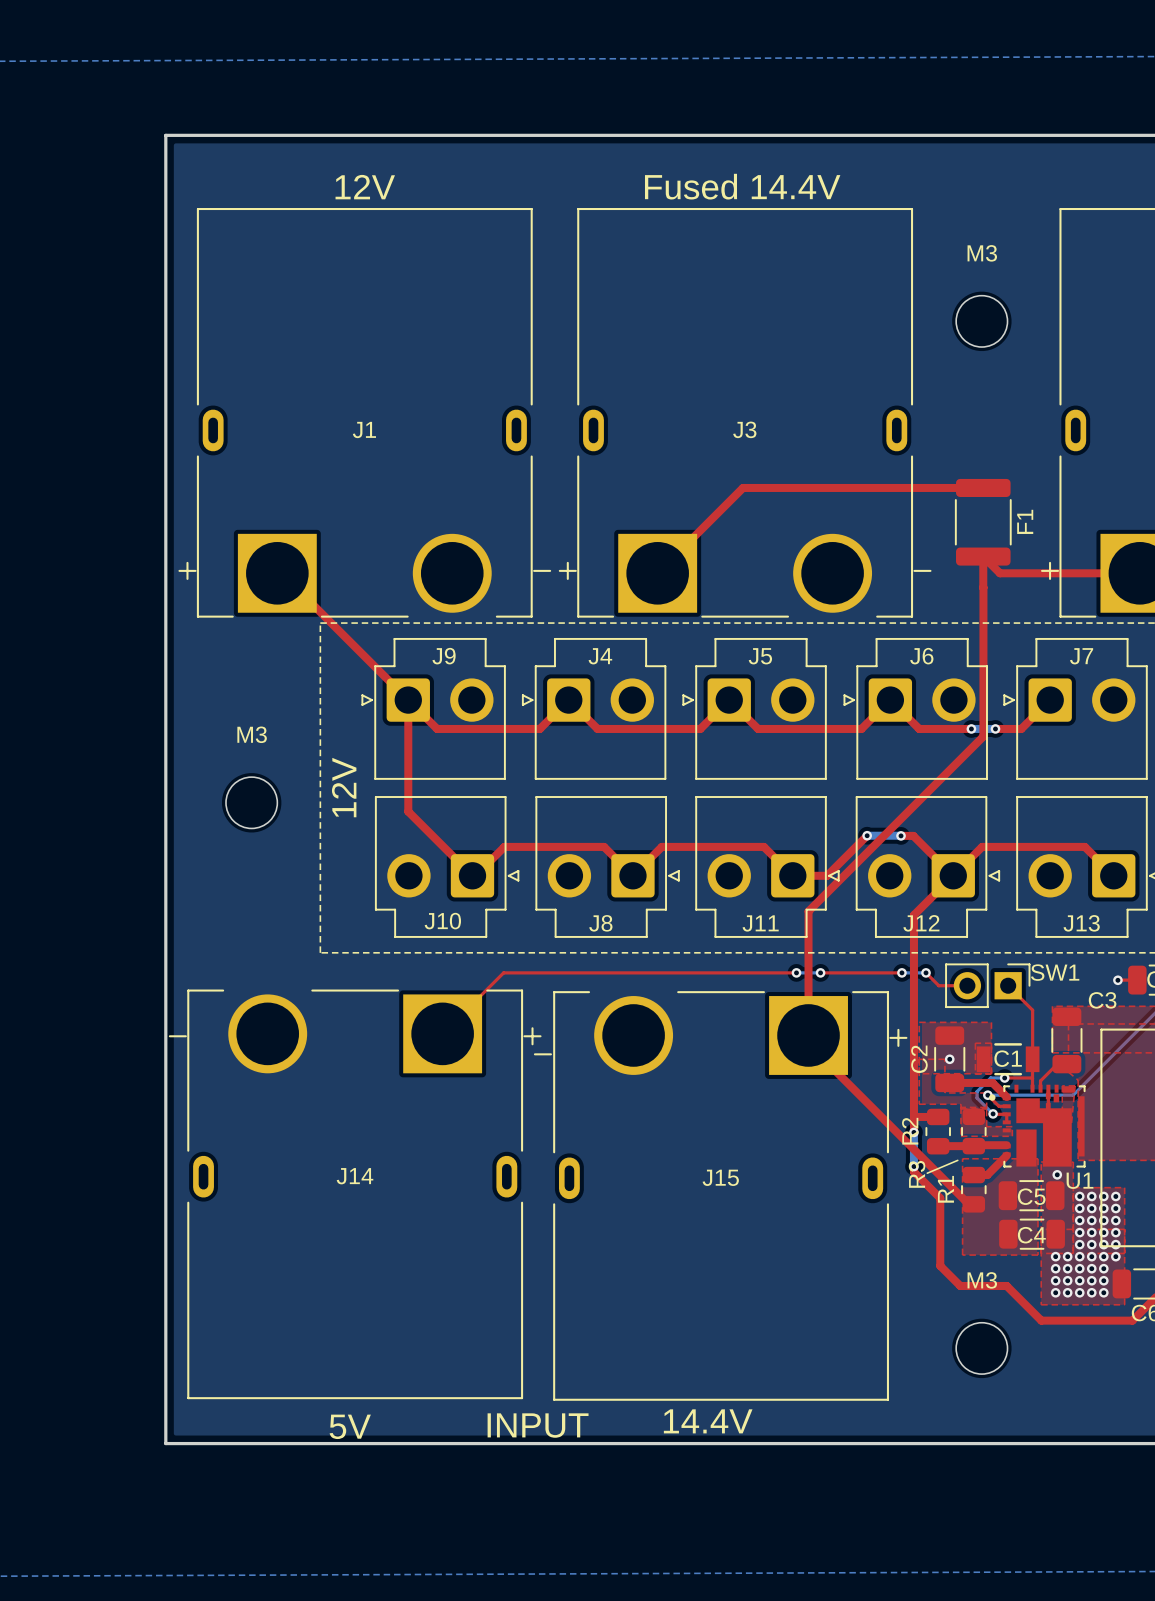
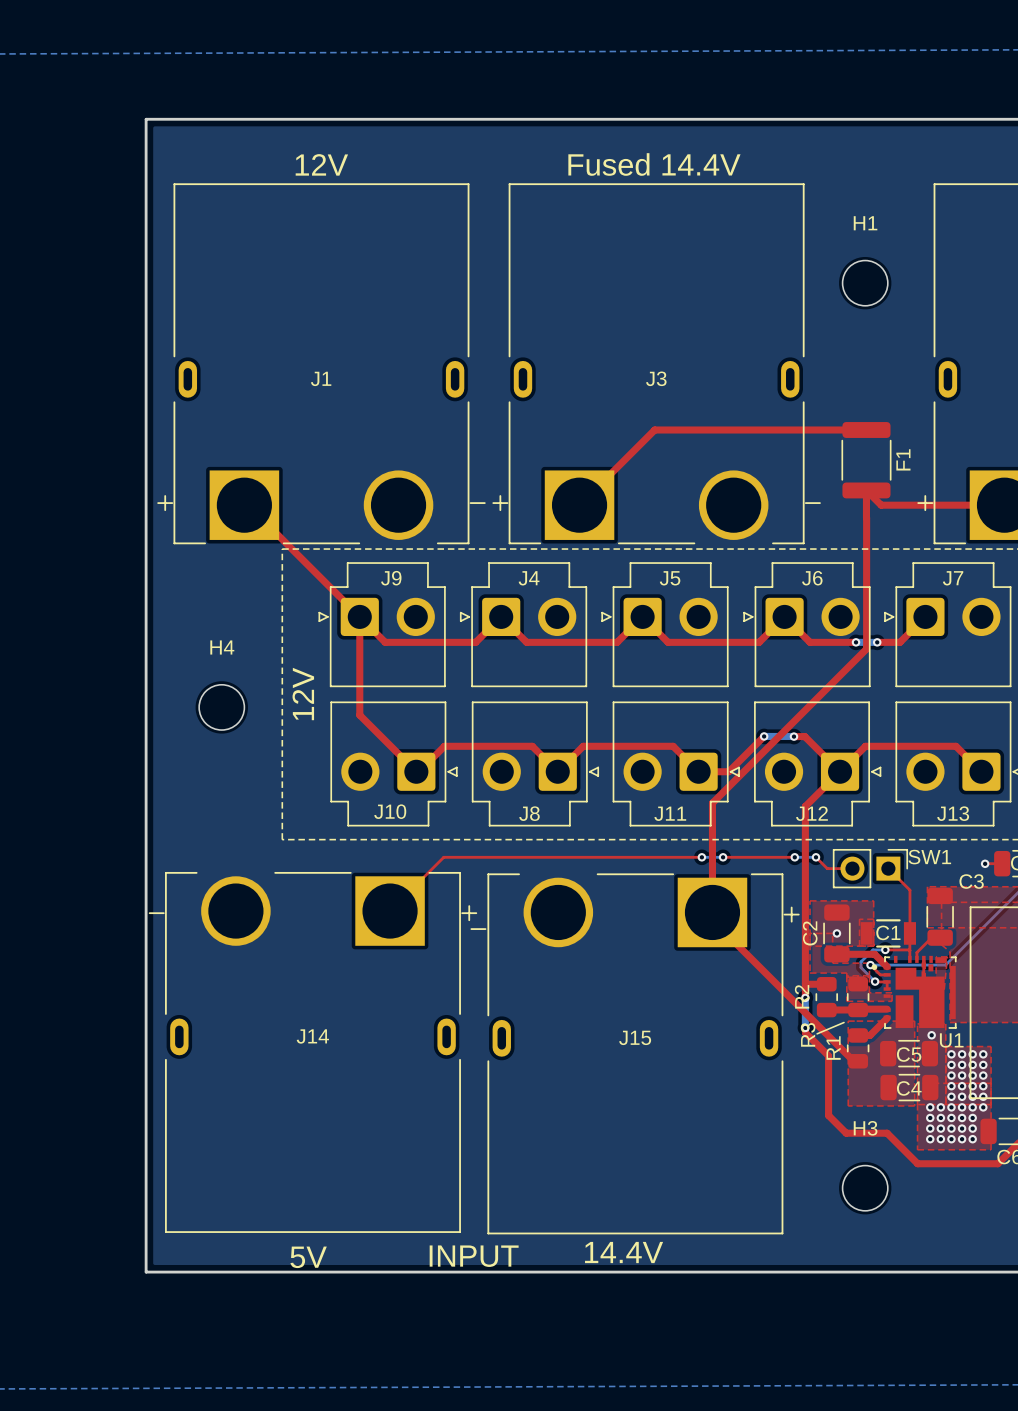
M3 name: M3 (982, 253) -> H1 (865, 223)
M3 name: M3 (252, 734) -> H4 (222, 647)
M3 name: M3 (982, 1280) -> H3 (865, 1128)

